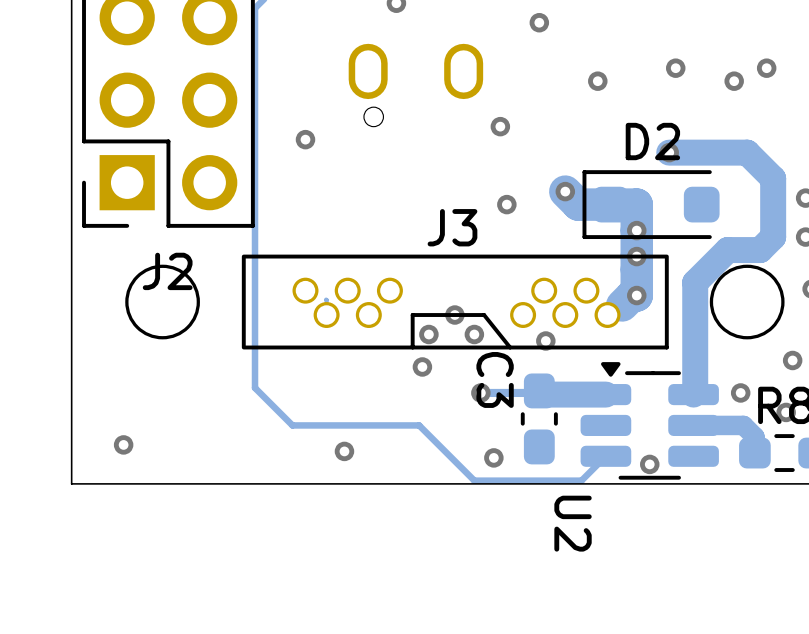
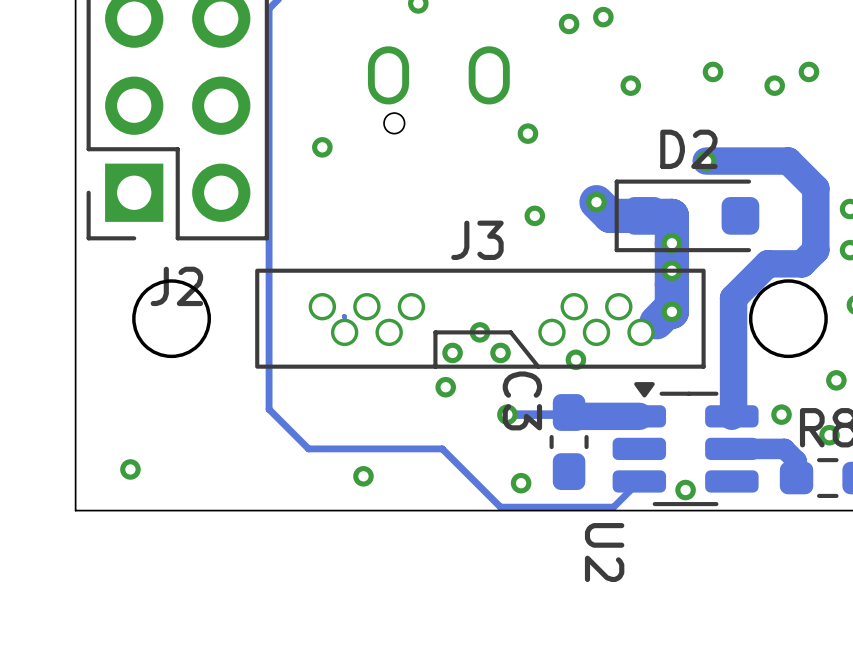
via: none -> (603, 17)

